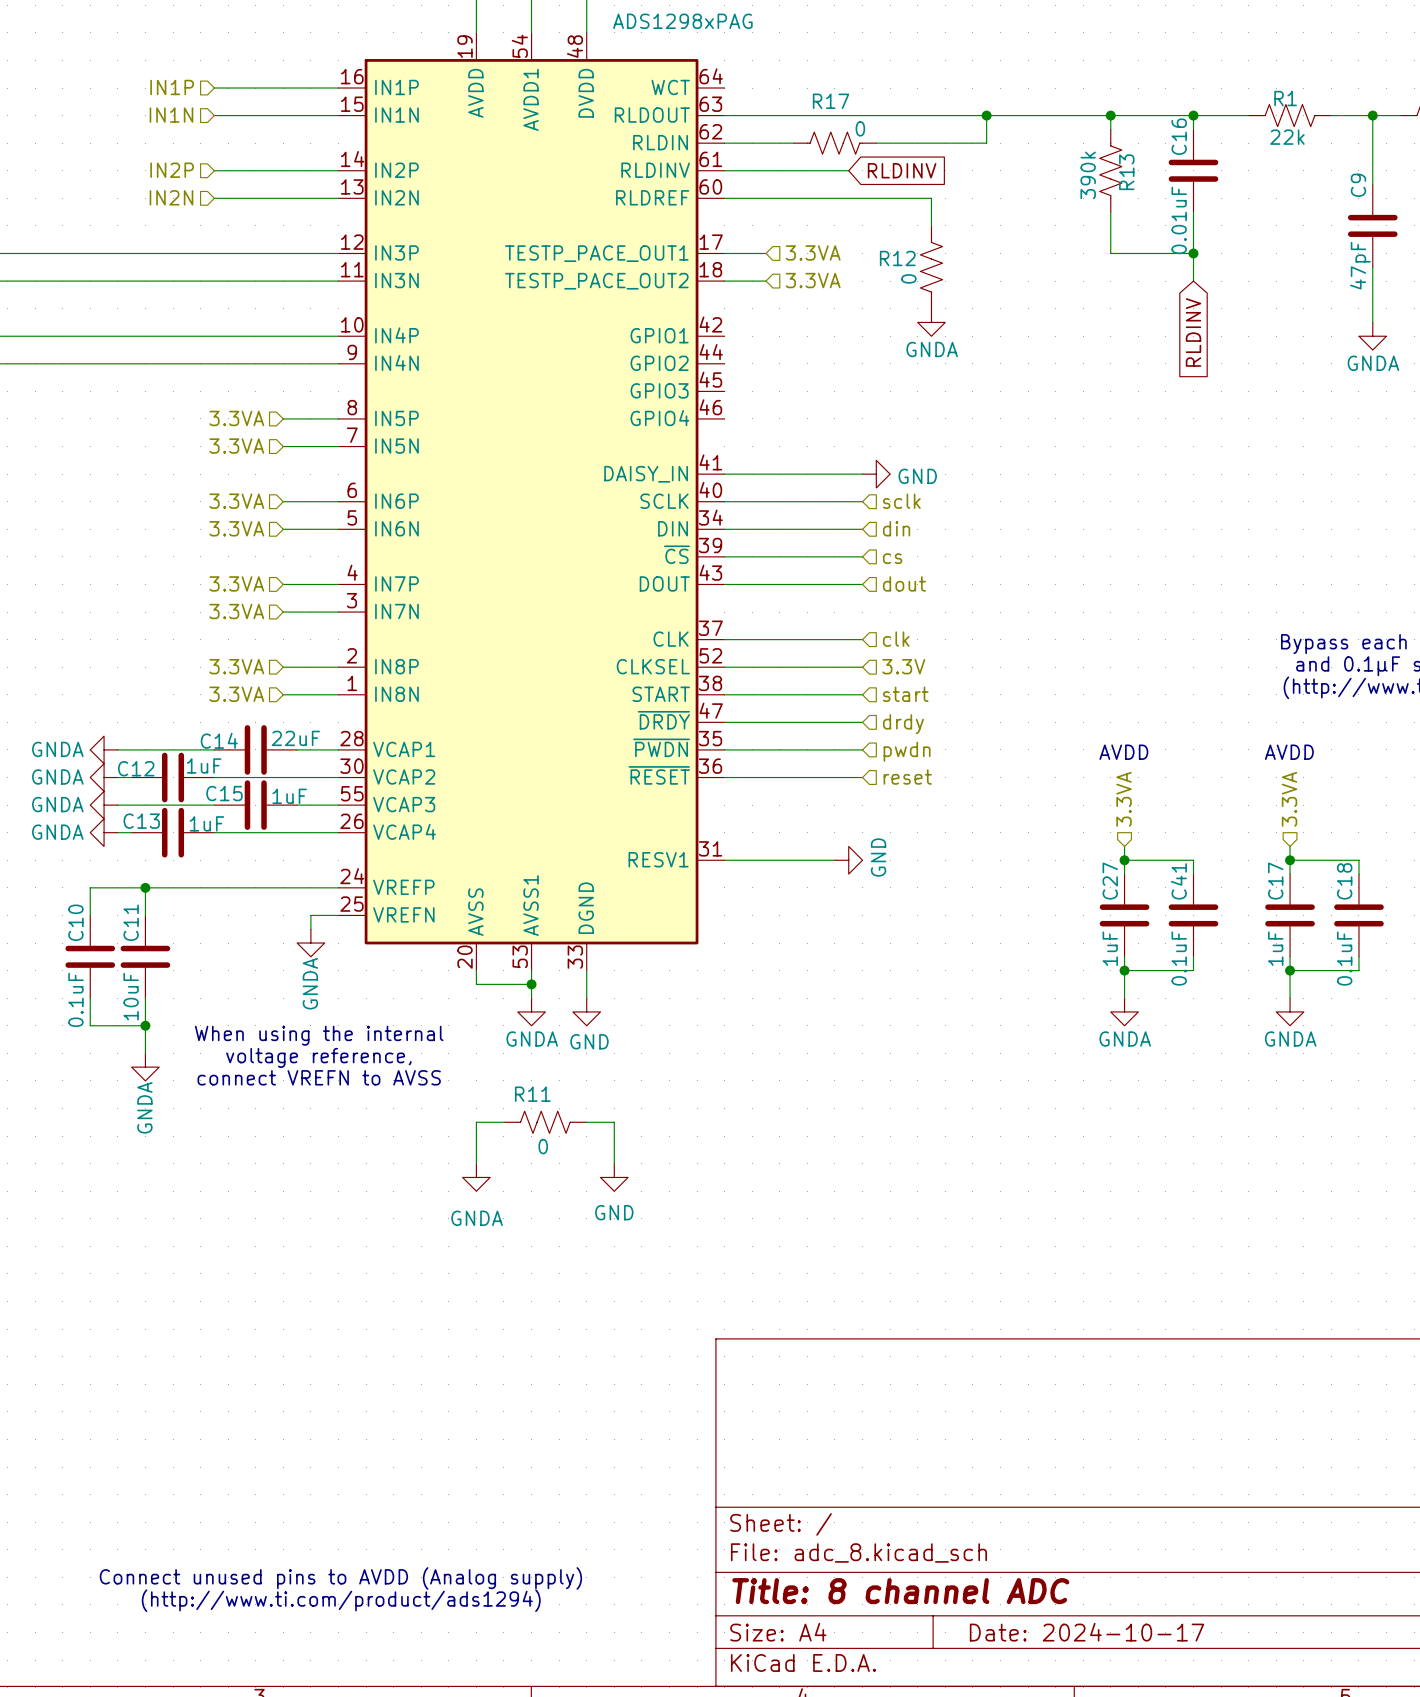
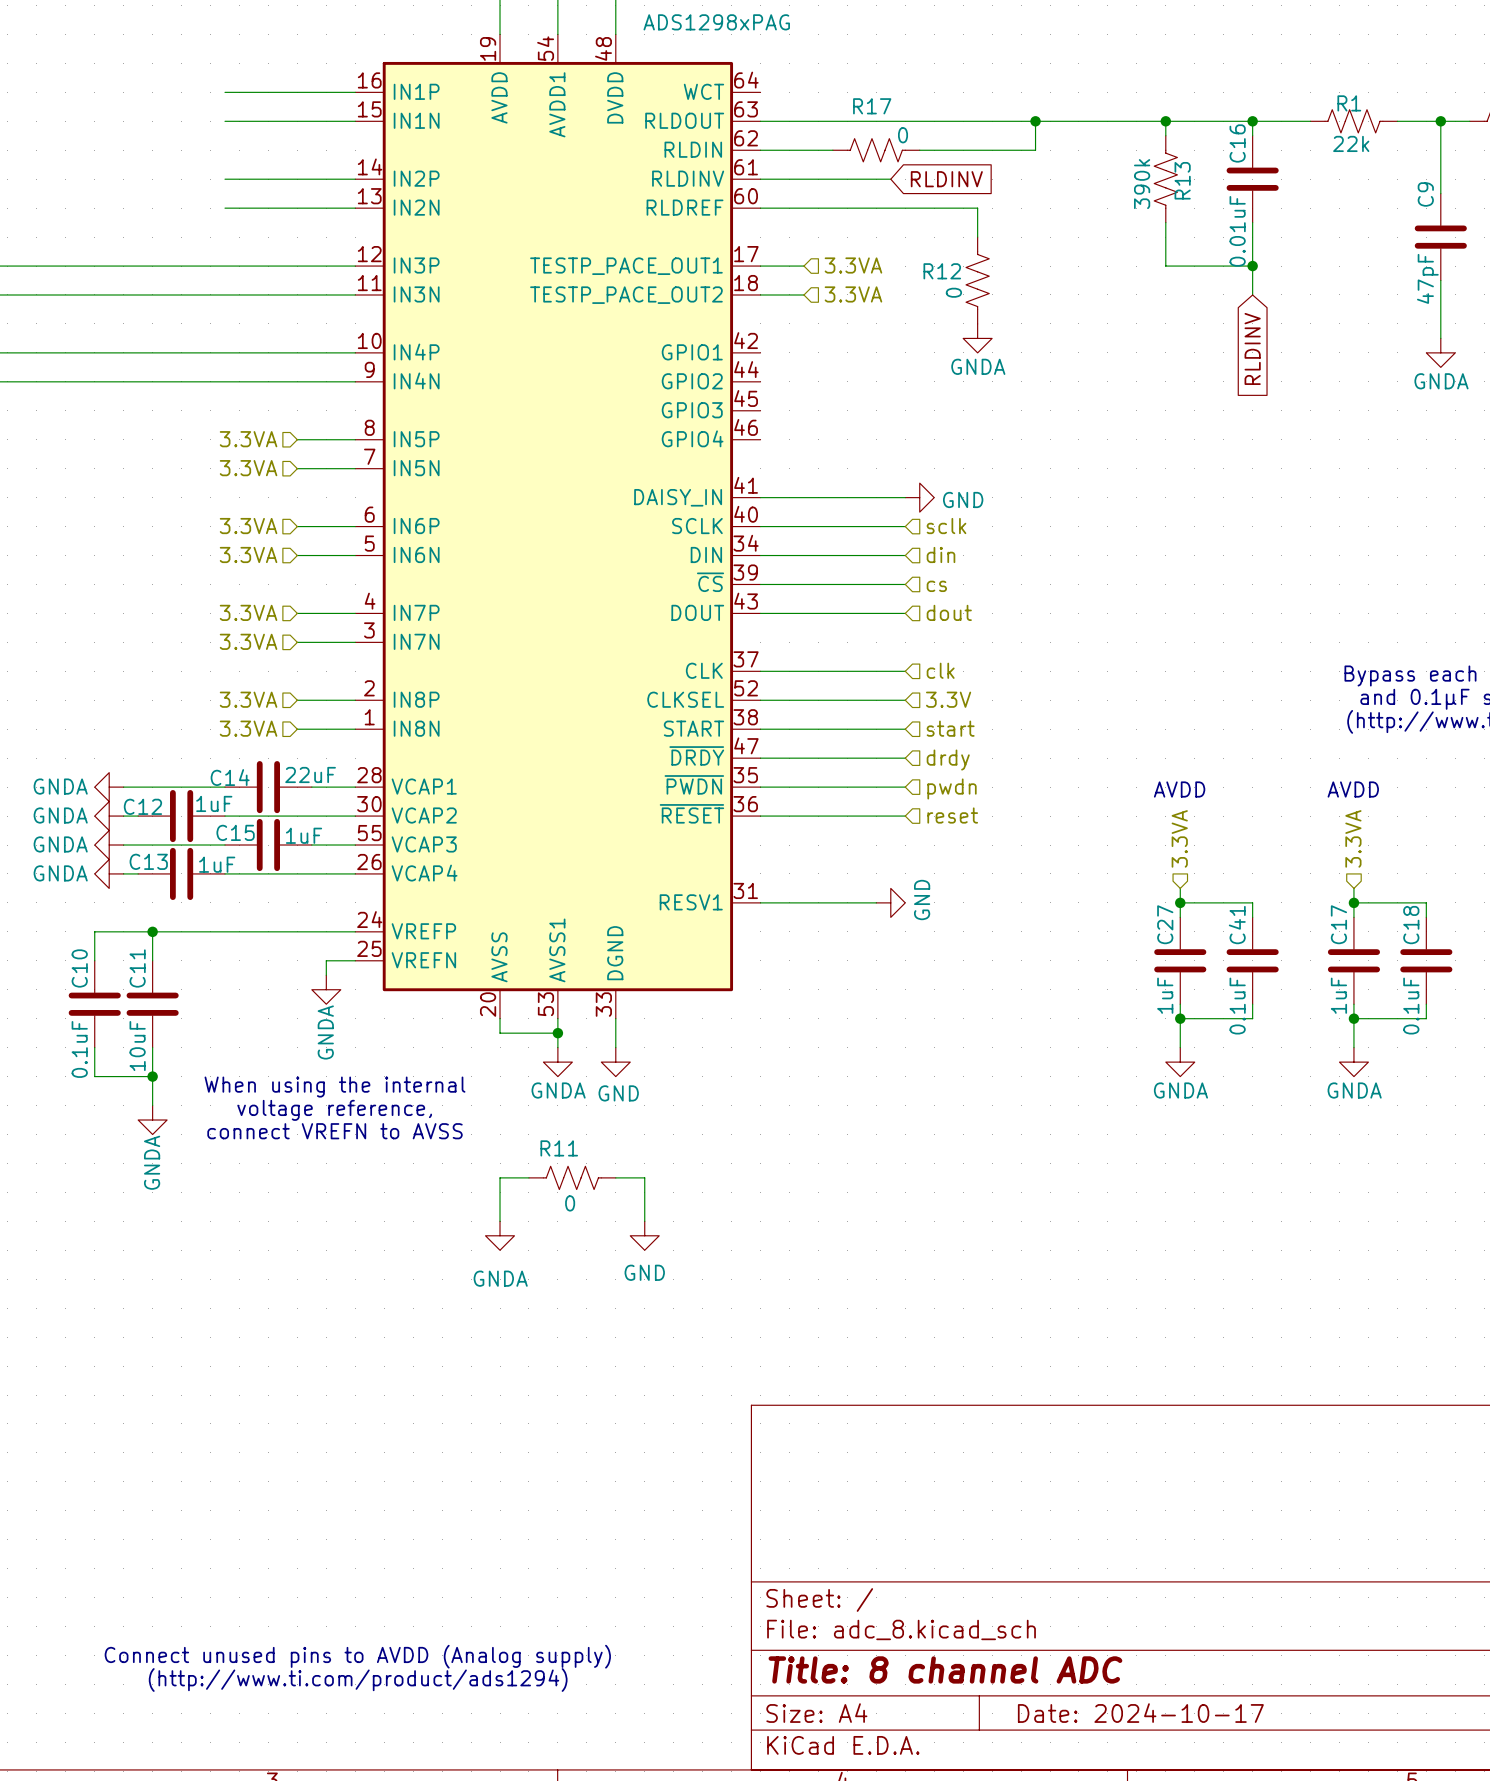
hierarchical label: IN1P (172, 87) -> none
hierarchical label: IN1N (171, 115) -> none
hierarchical label: IN2P (172, 170) -> none
hierarchical label: IN2N (171, 197) -> none

